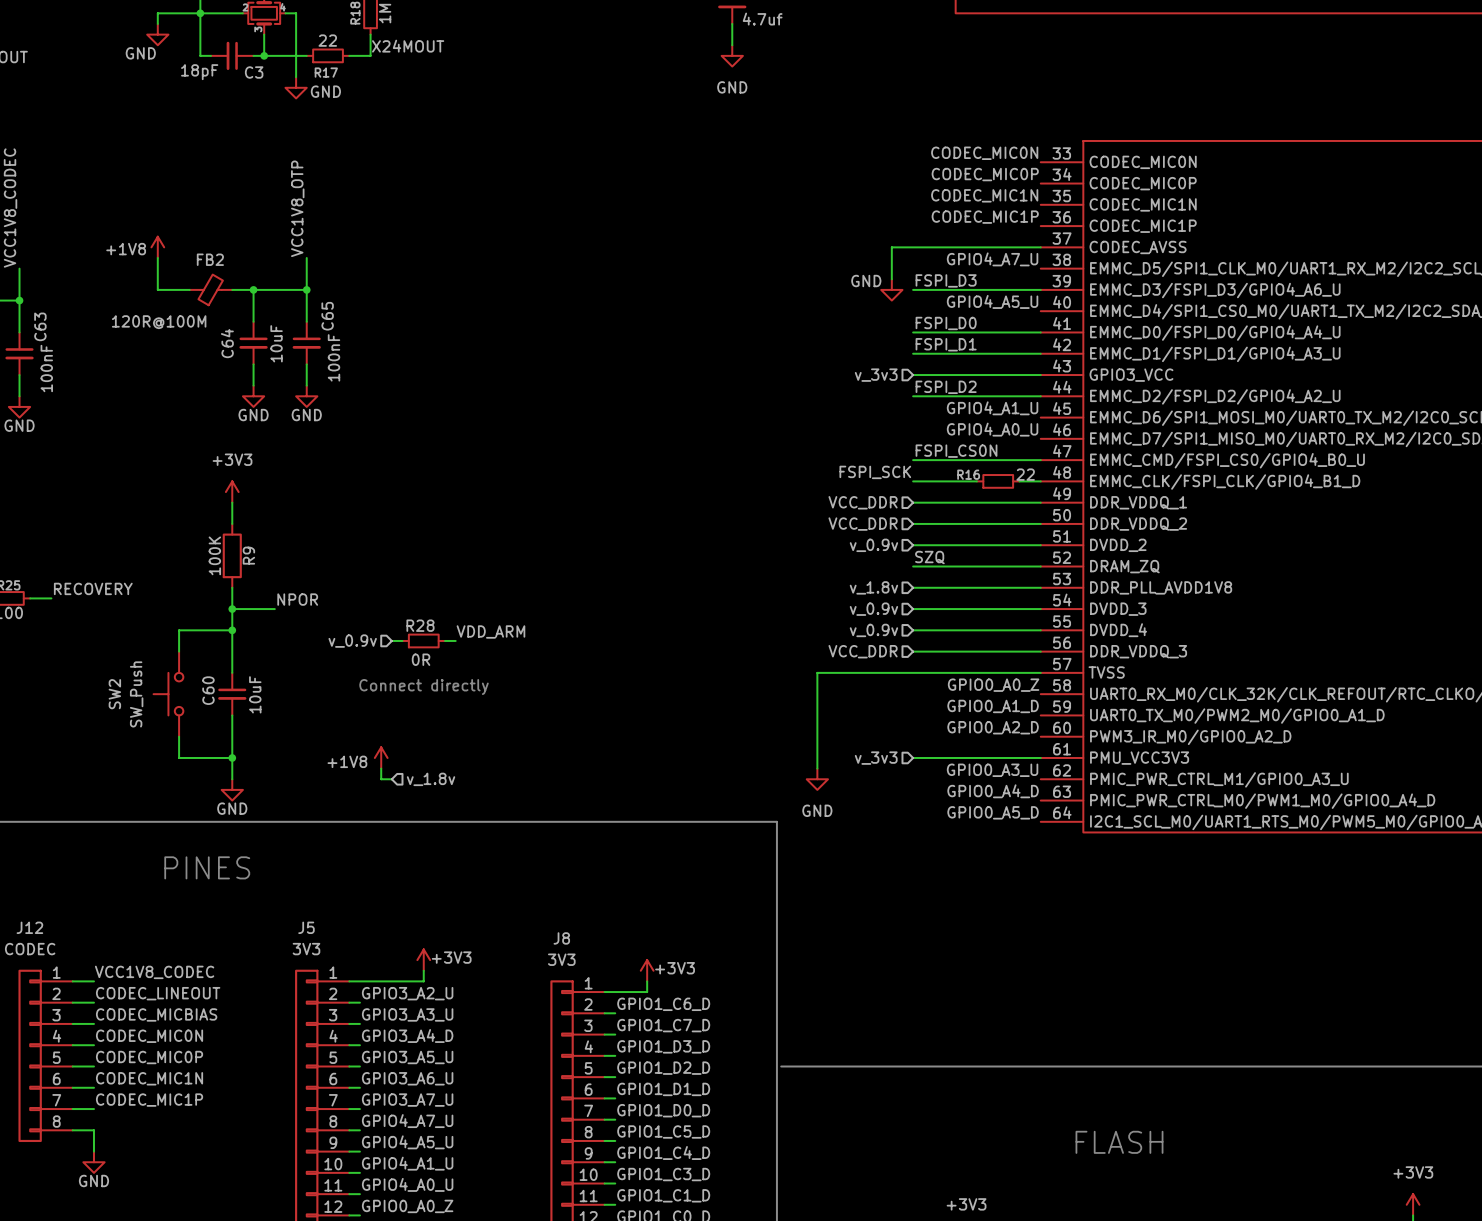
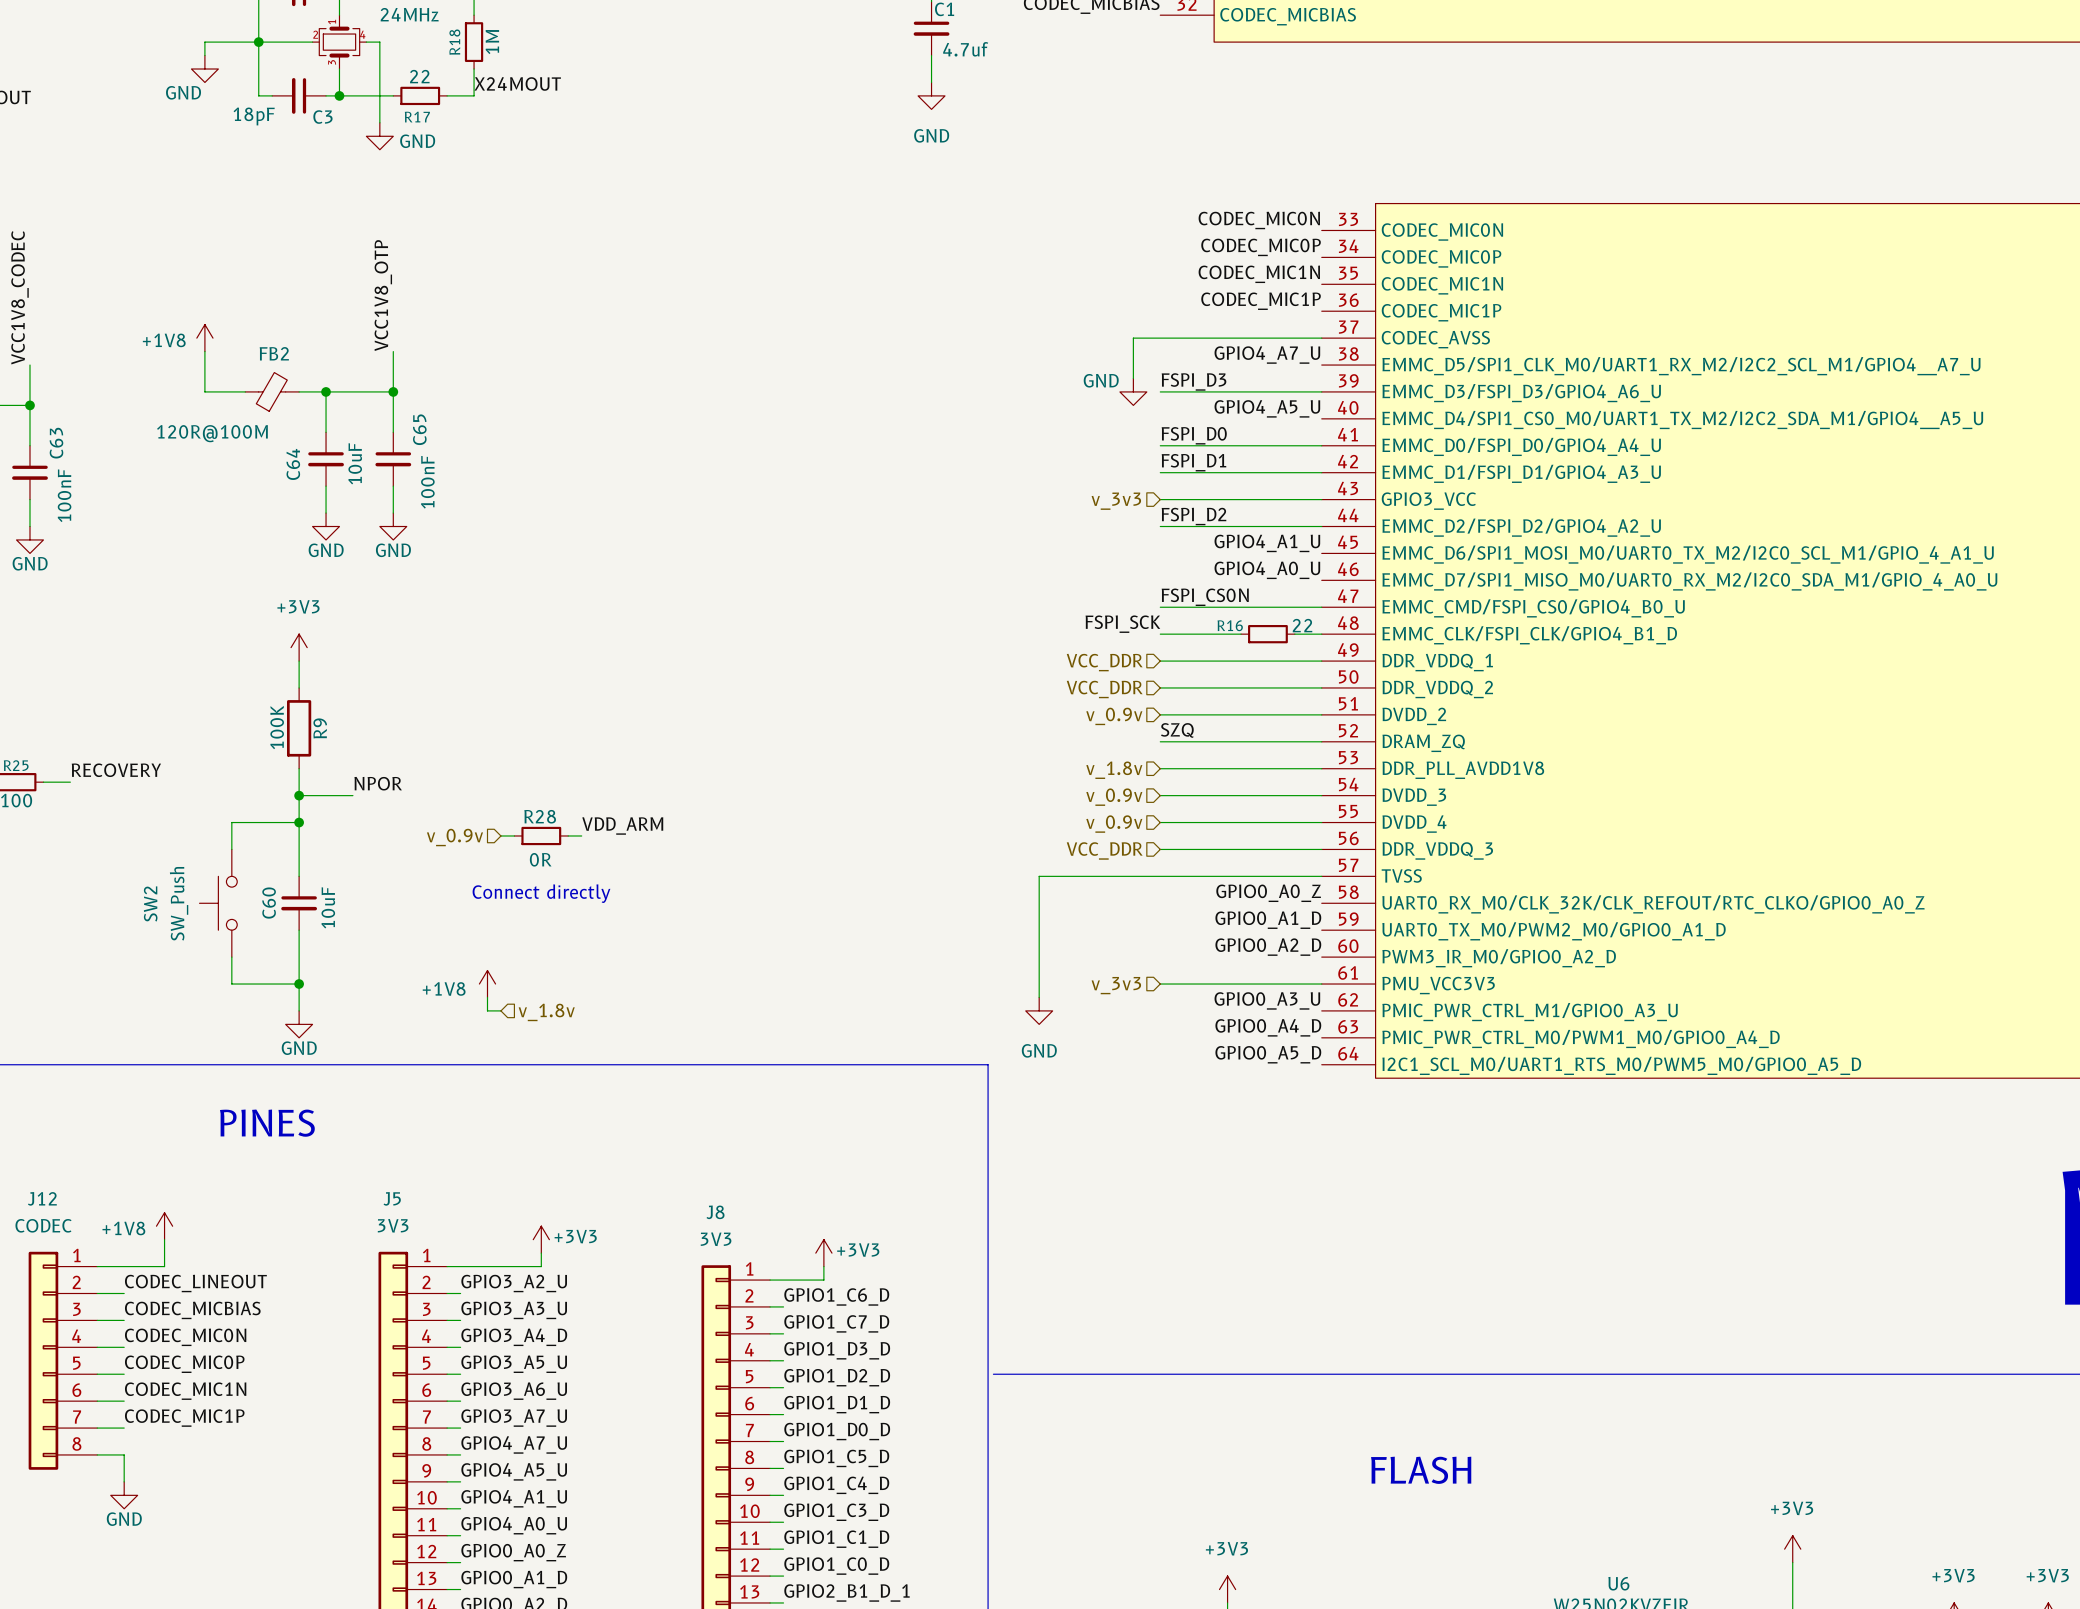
power symbol: none -> +1V8 (164, 1226)
wire: none -> (164, 1239) (164, 1266) (124, 1266)
label: VCC1V8_CODEC (154, 972) -> none

